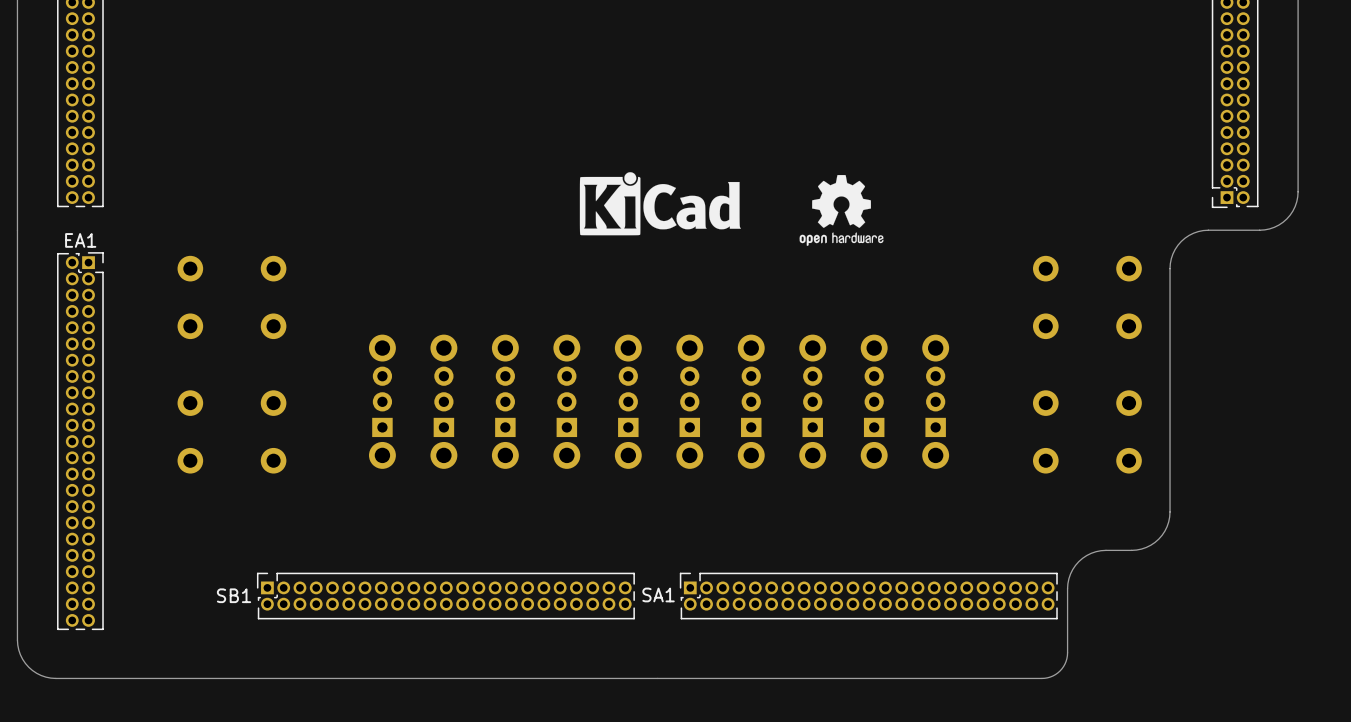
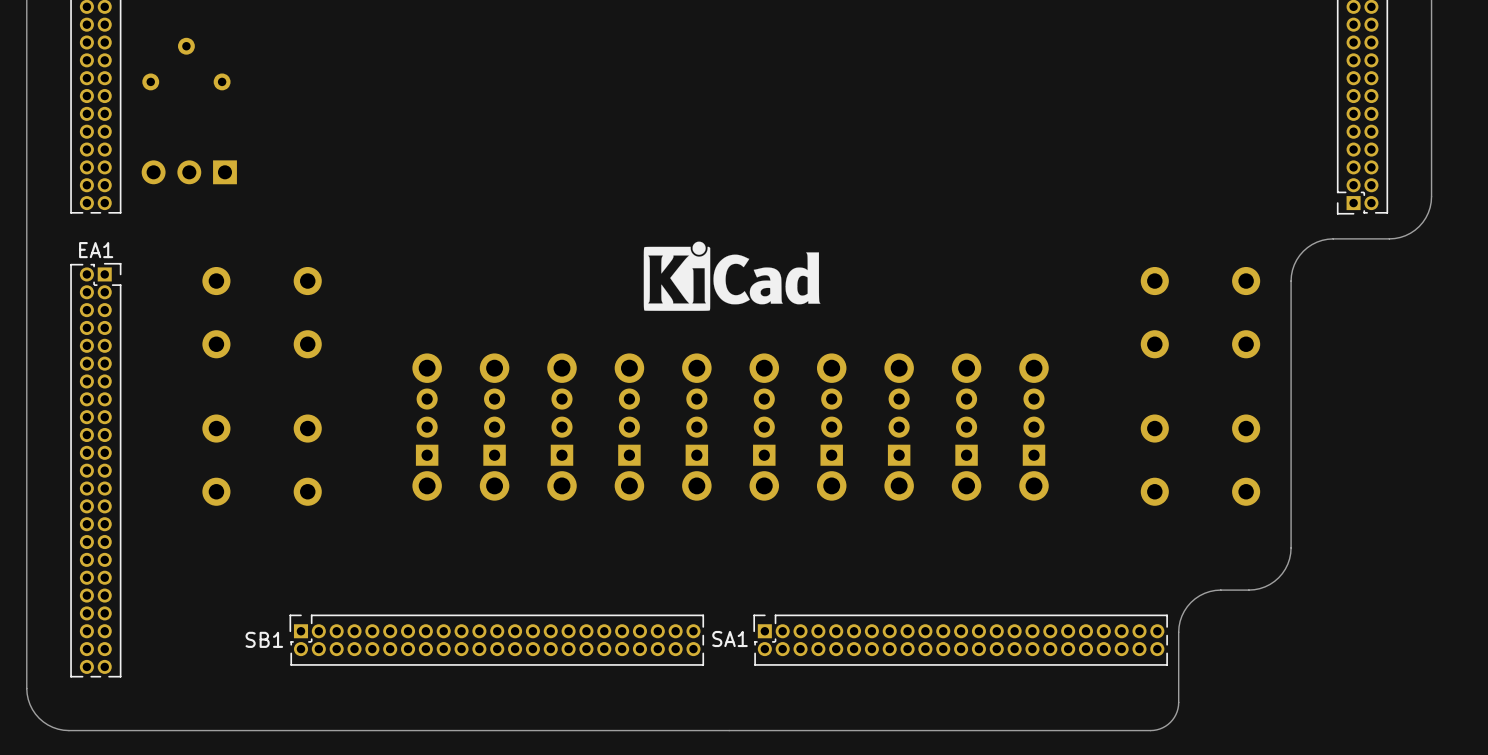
part: none -> (186, 64)
part: none -> (189, 172)
drawing: [799, 175, 884, 246] -> none
drawing position: (660, 203) -> (732, 276)

